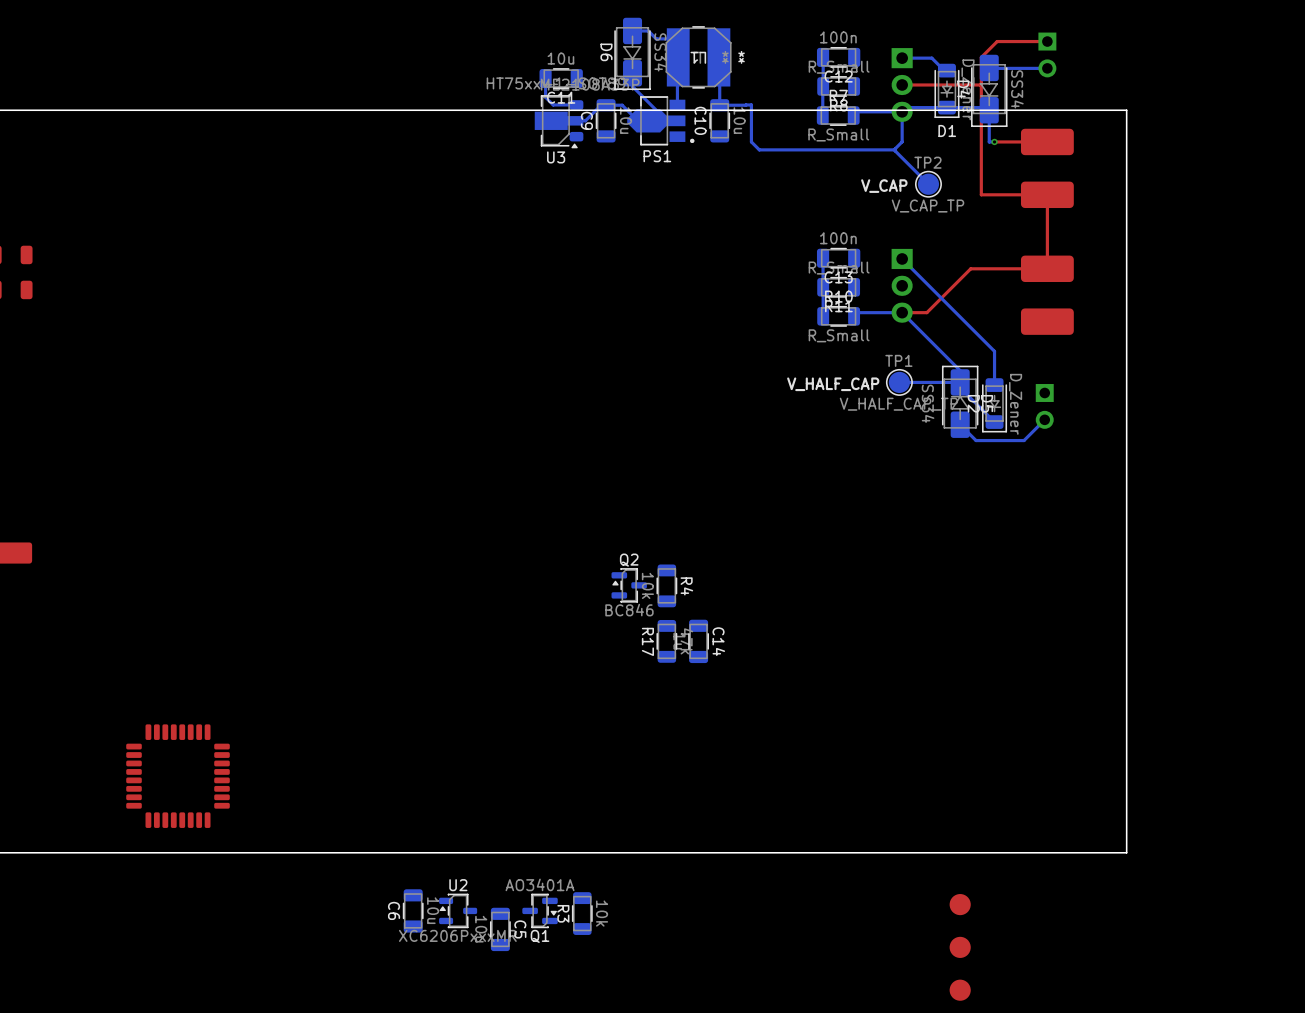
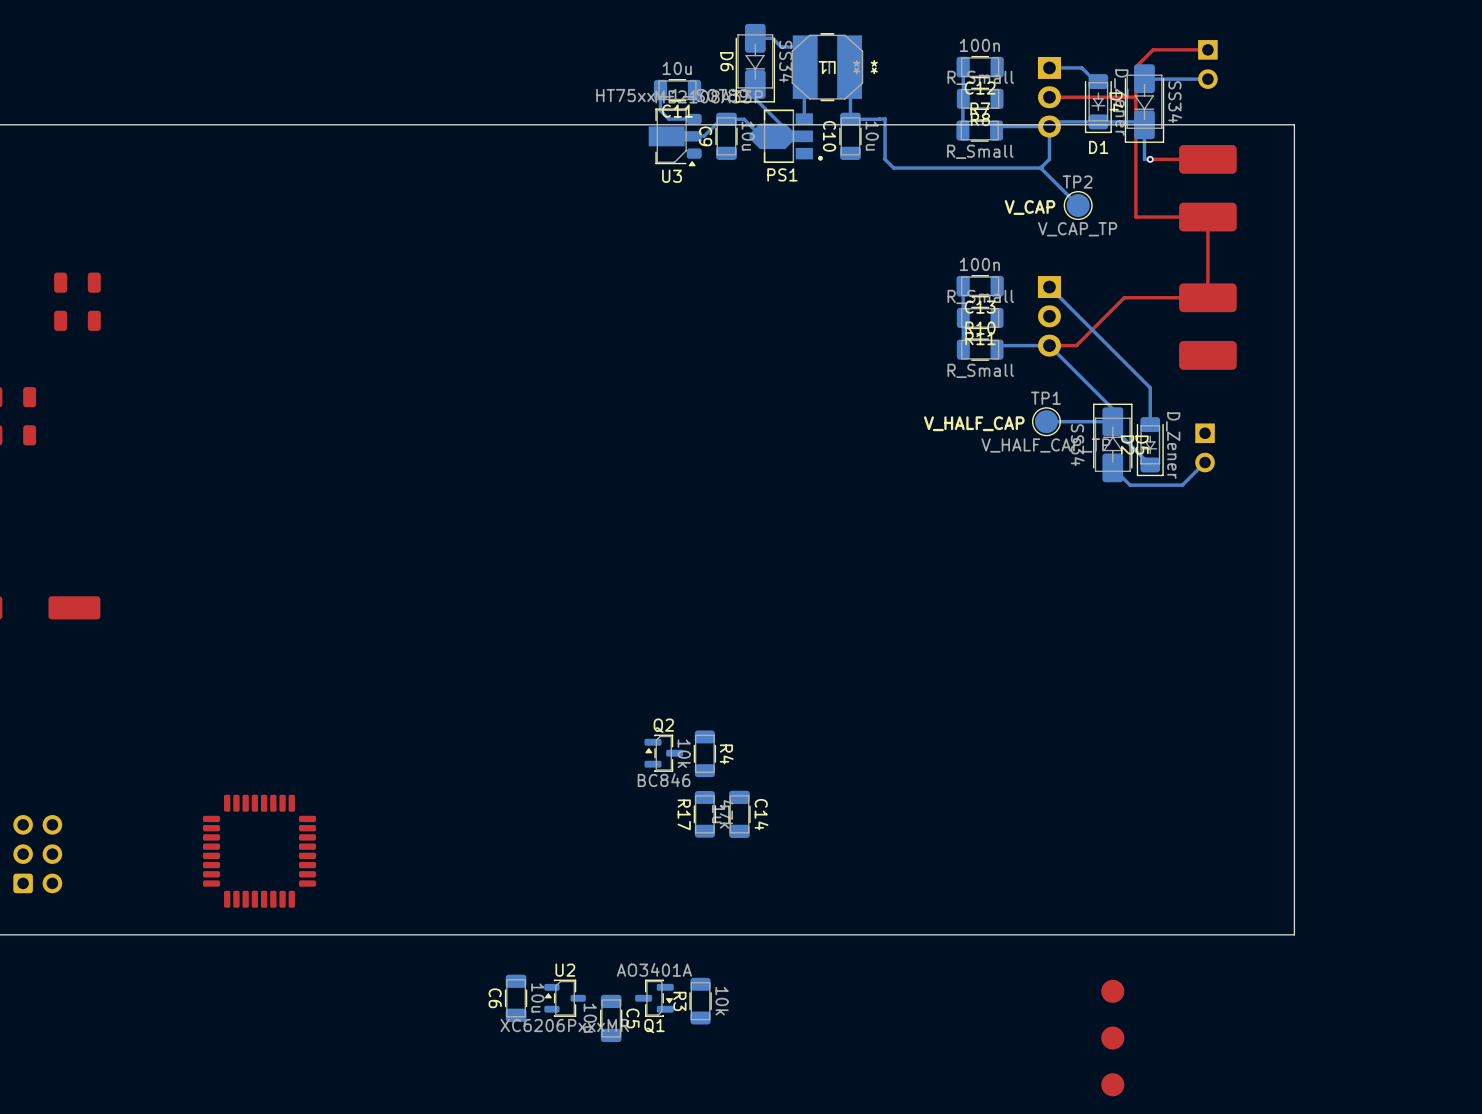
Q2 position: (629, 585) -> (663, 753)
R4 position: (666, 585) -> (704, 753)
R17 position: (666, 641) -> (704, 814)
C14 position: (698, 641) -> (739, 814)

